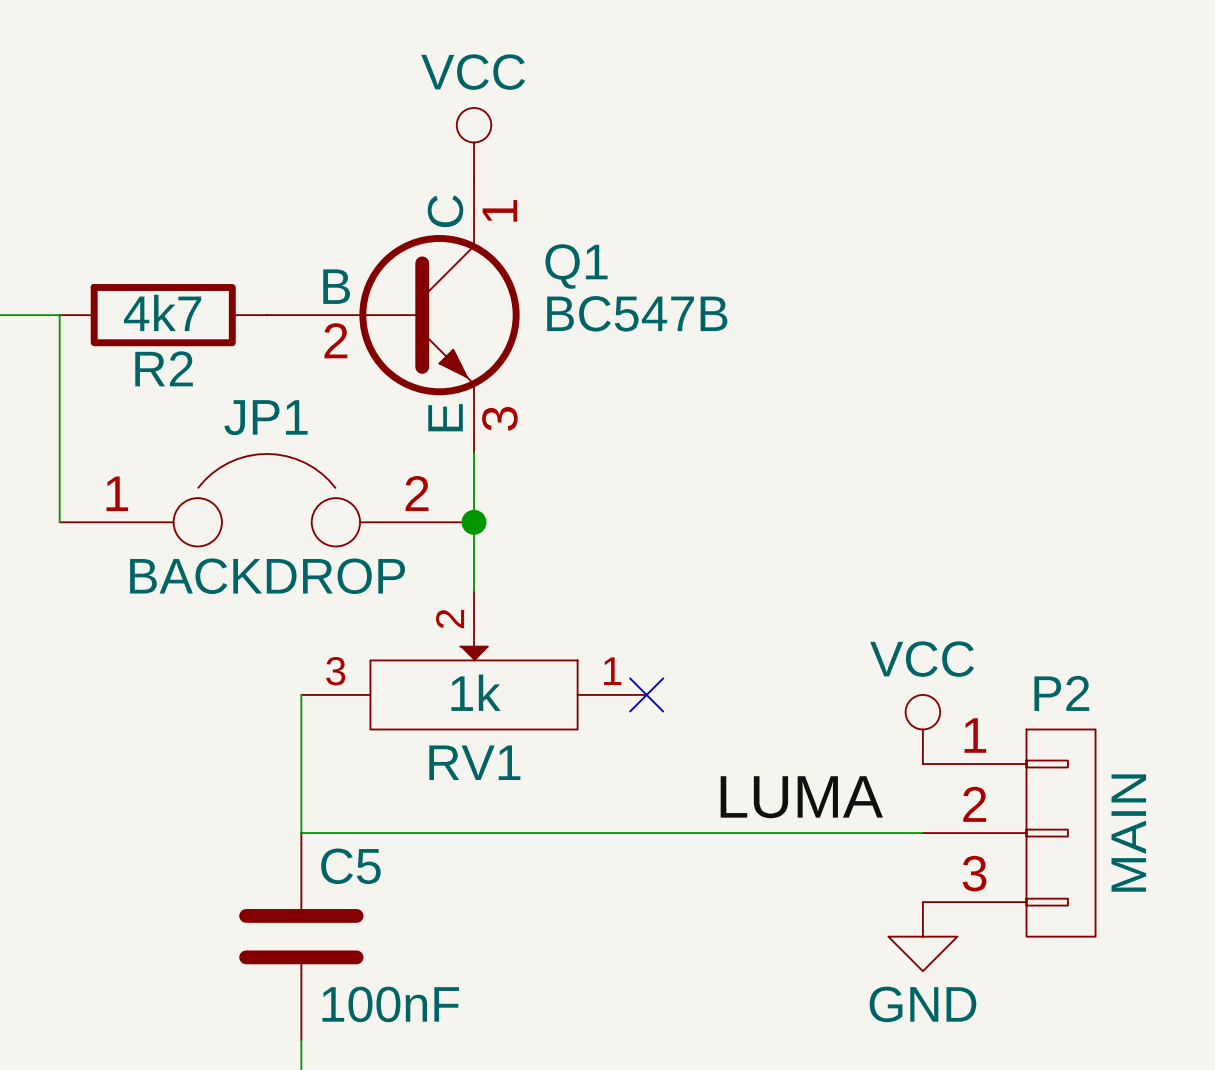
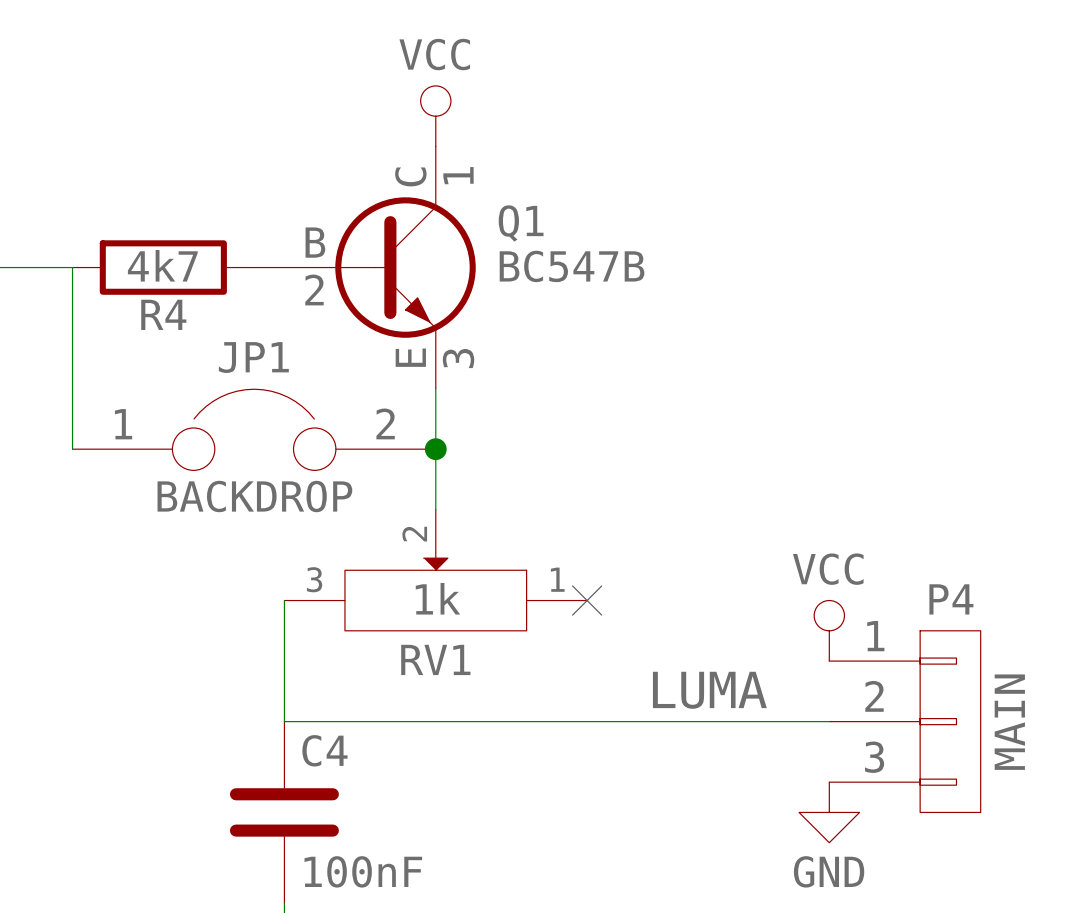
R2 name: R2 (164, 368) -> R4 (163, 314)
P2 name: P2 (1061, 693) -> P4 (951, 599)
C5 name: C5 (350, 866) -> C4 (324, 750)

